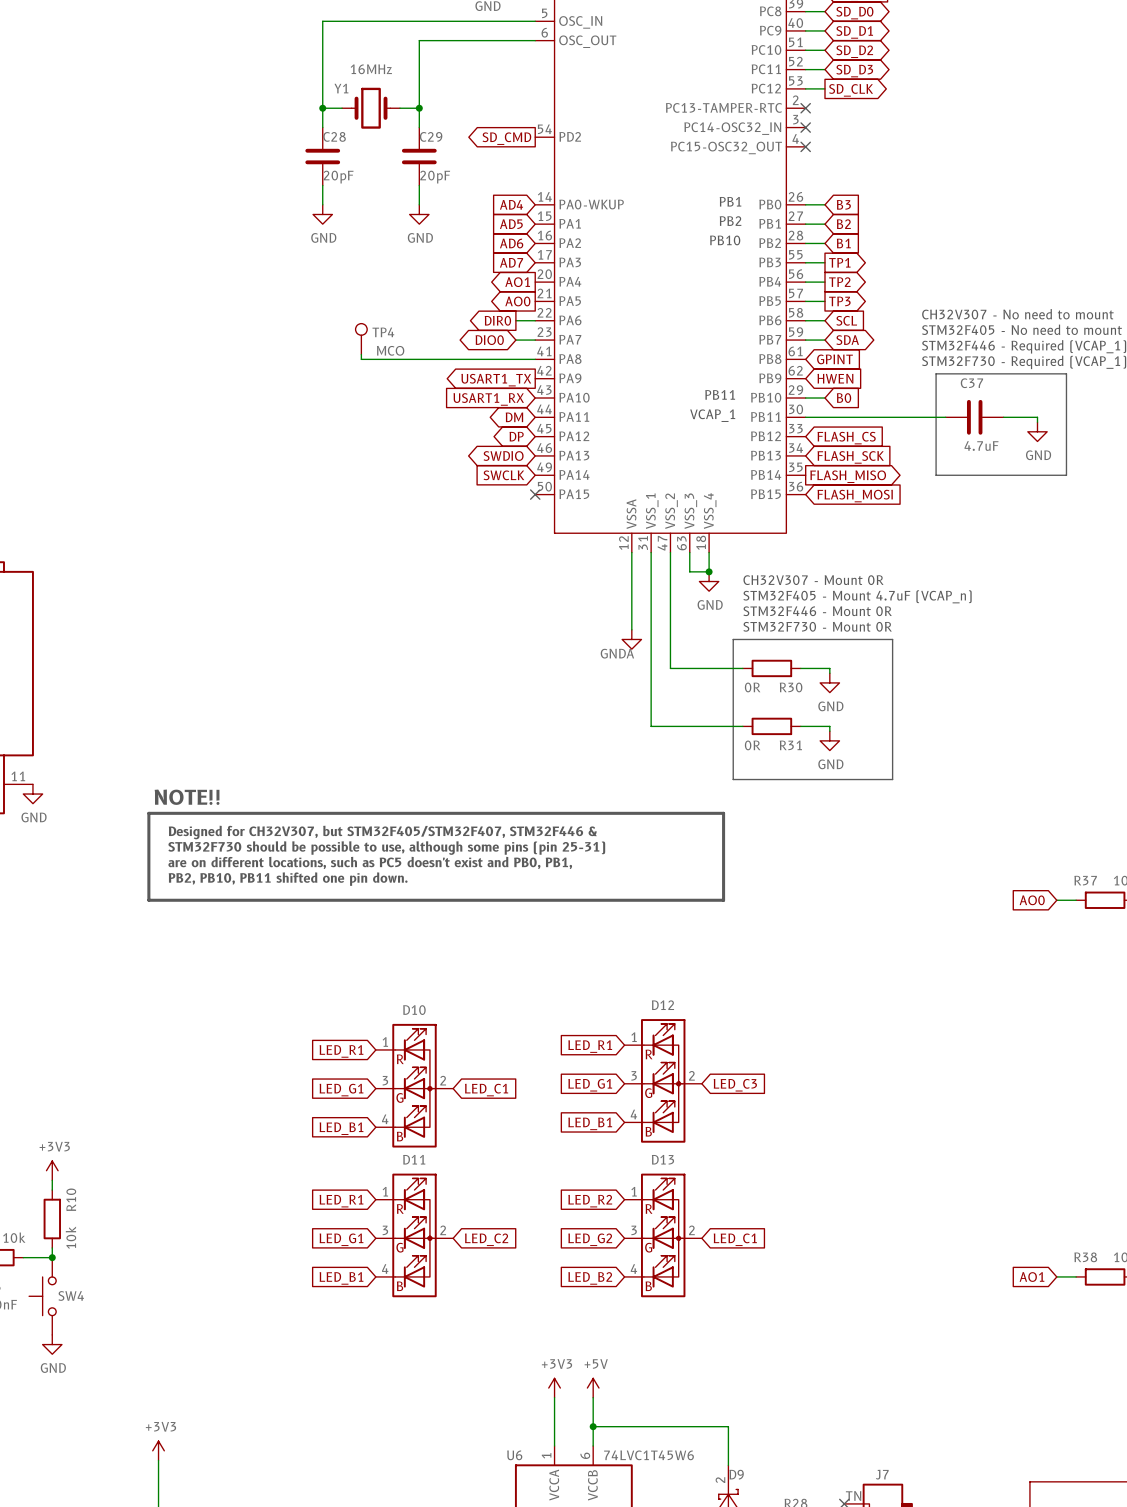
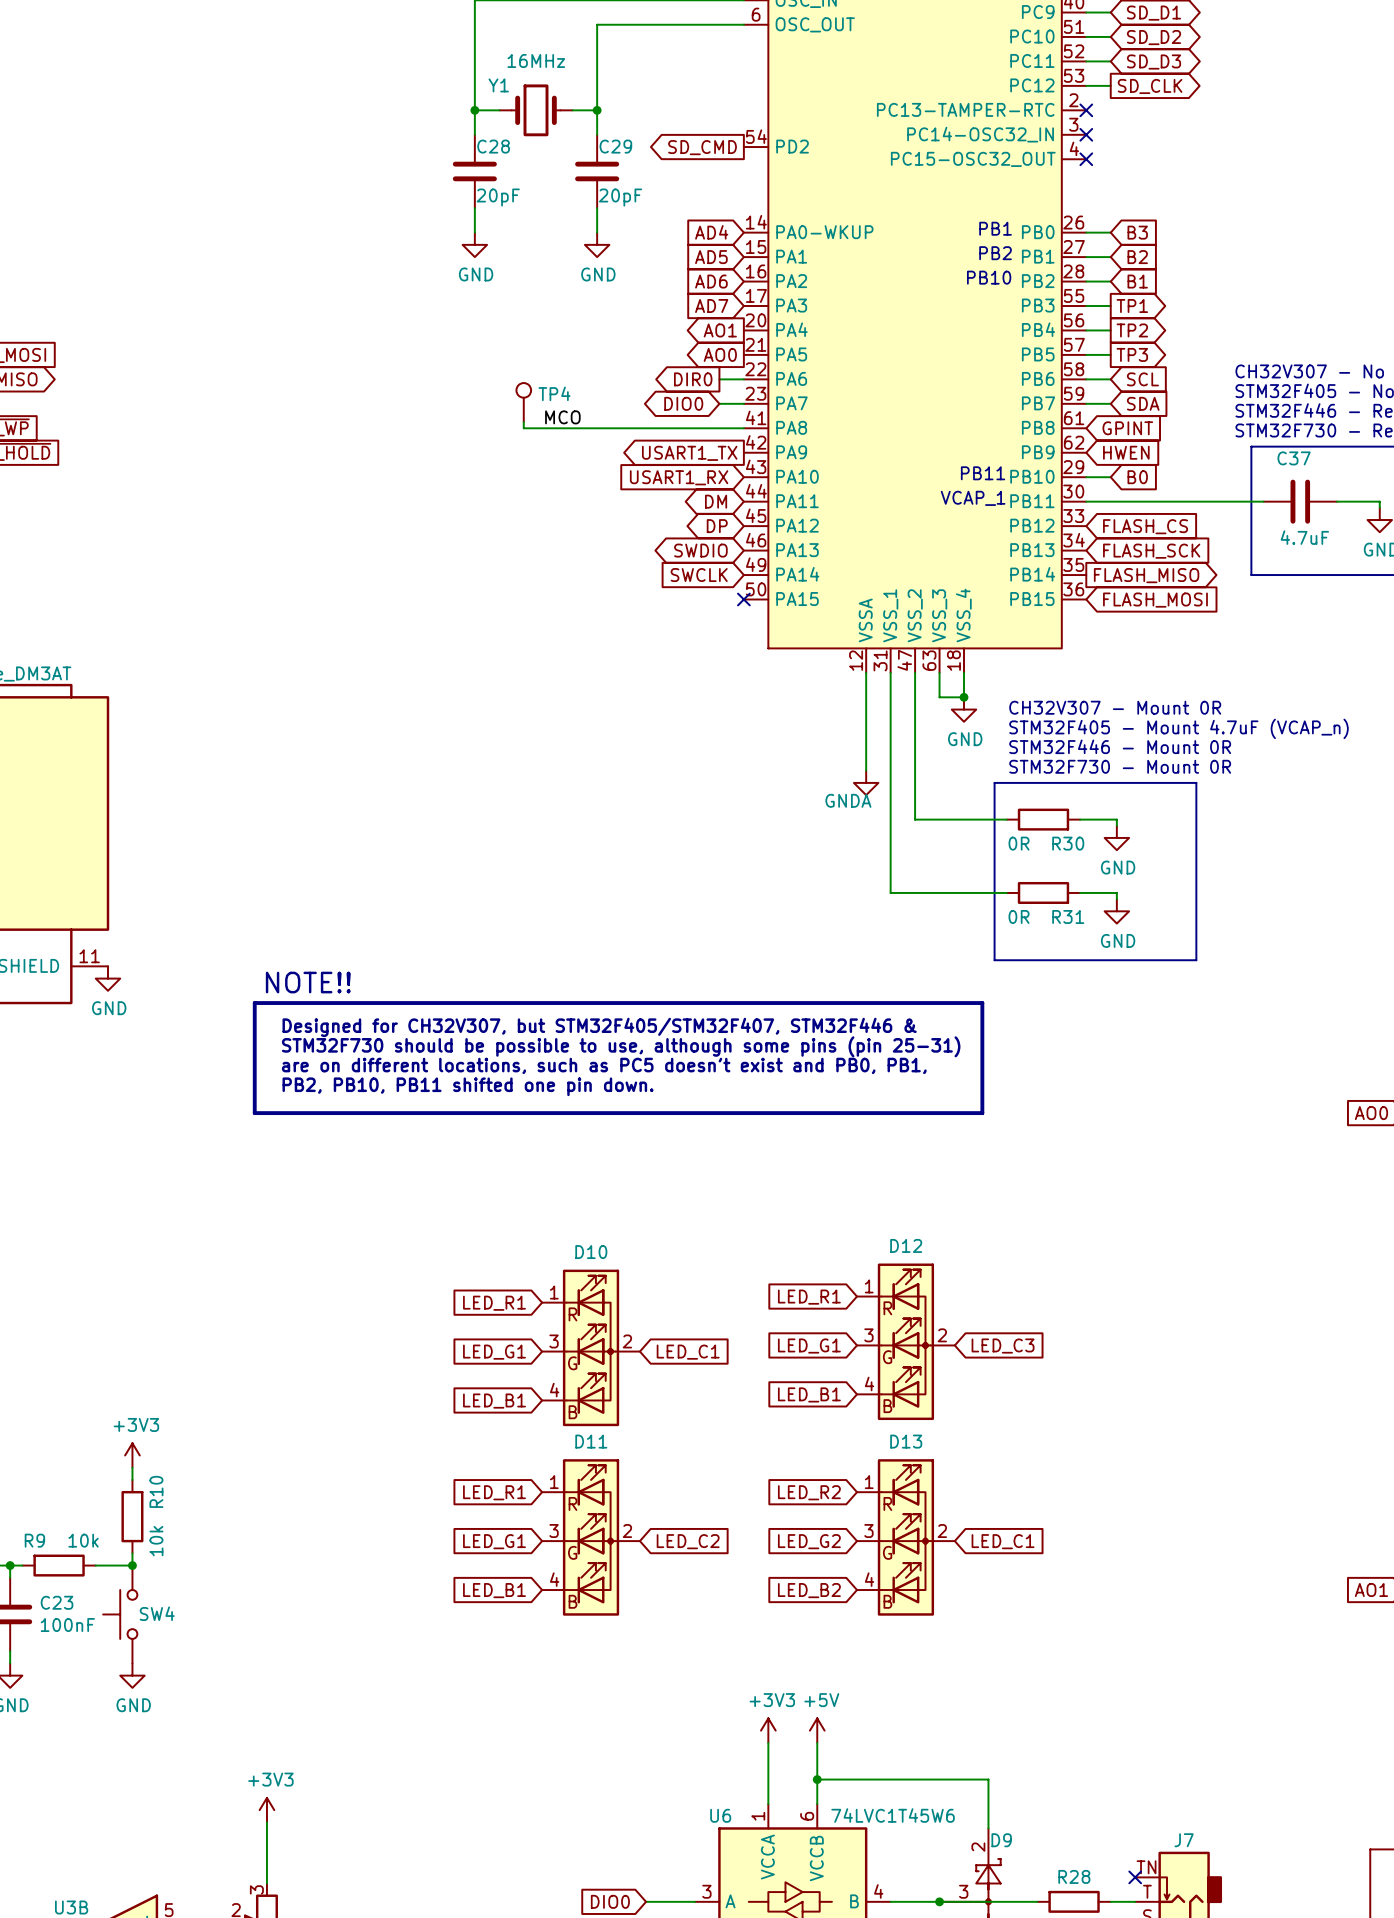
global label shape: bidirectional (847, 340) -> input (1143, 403)

